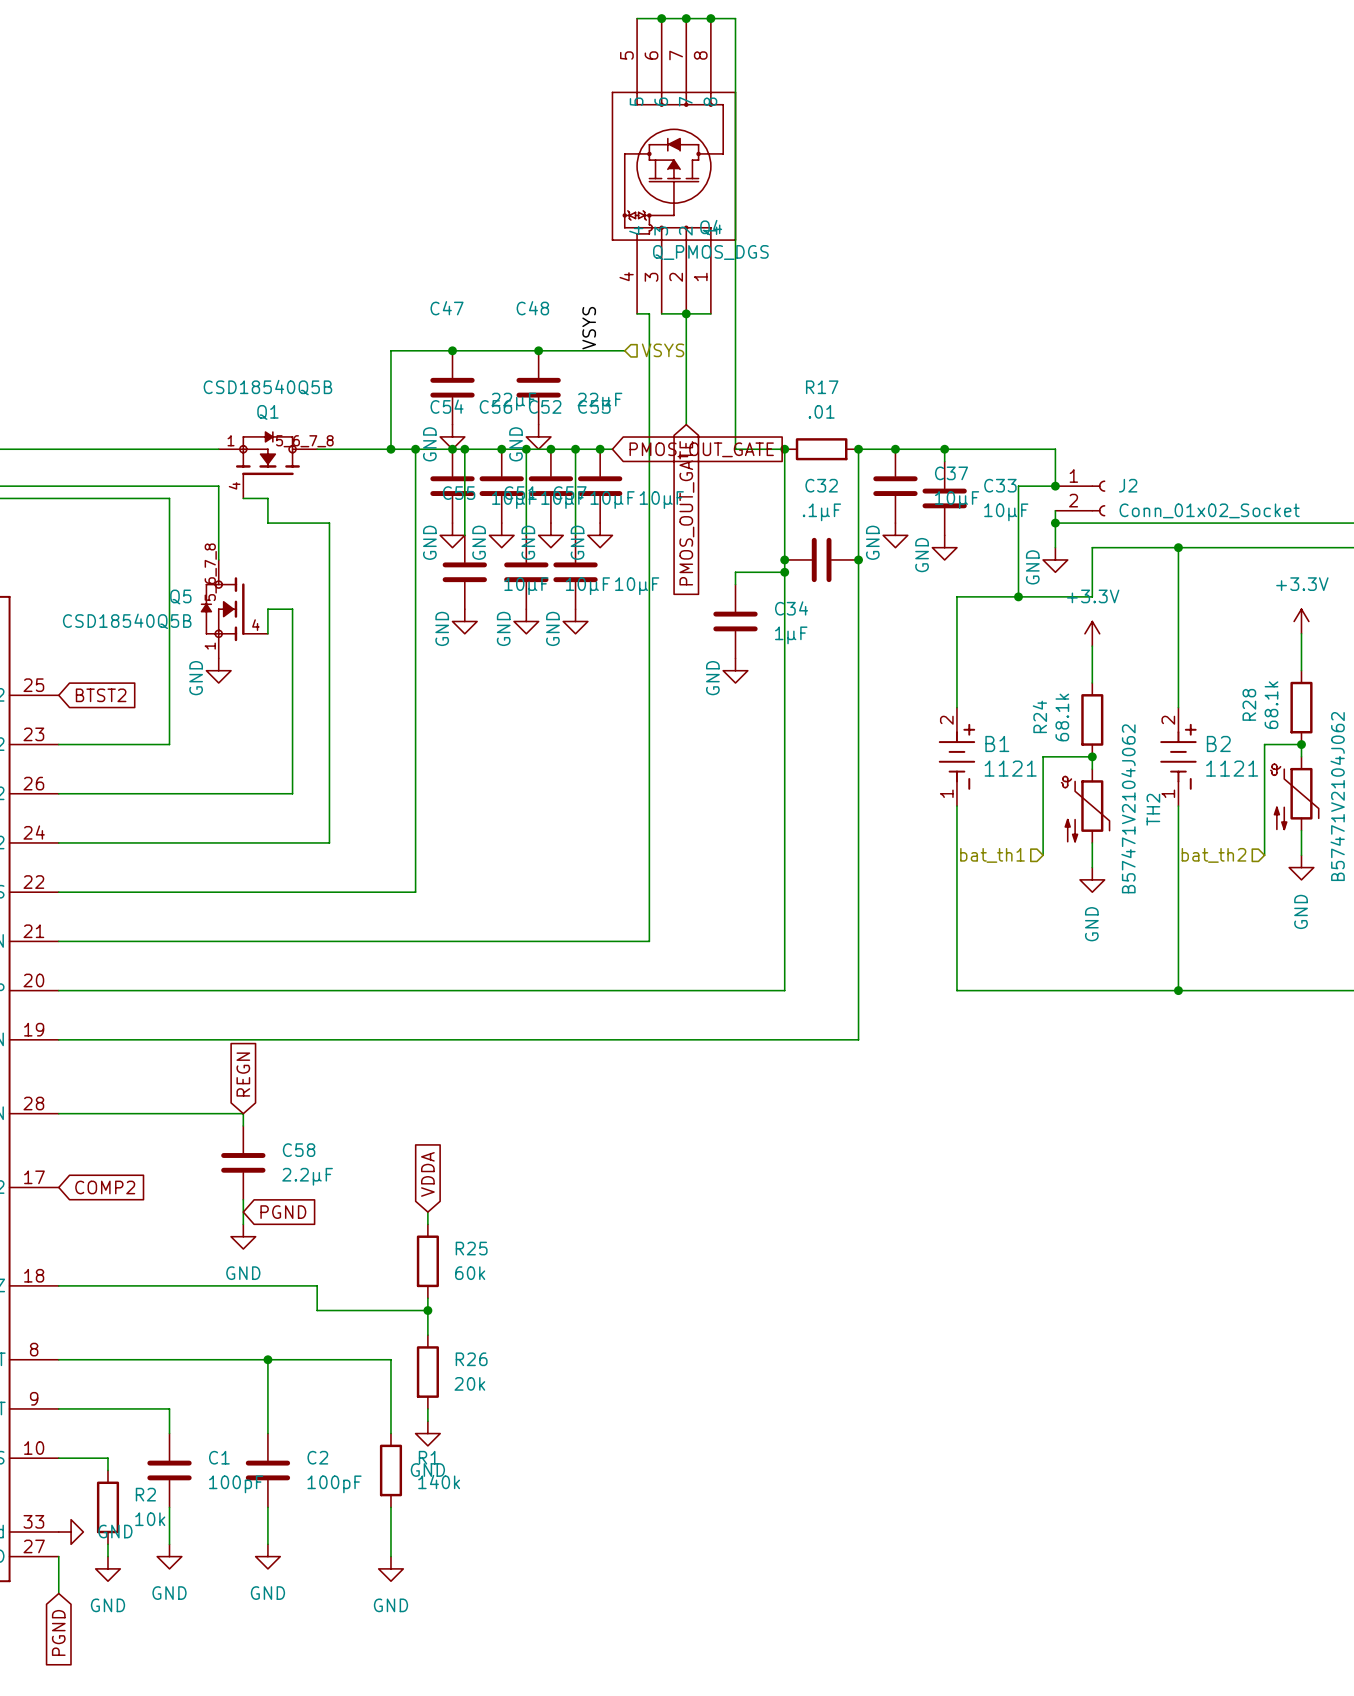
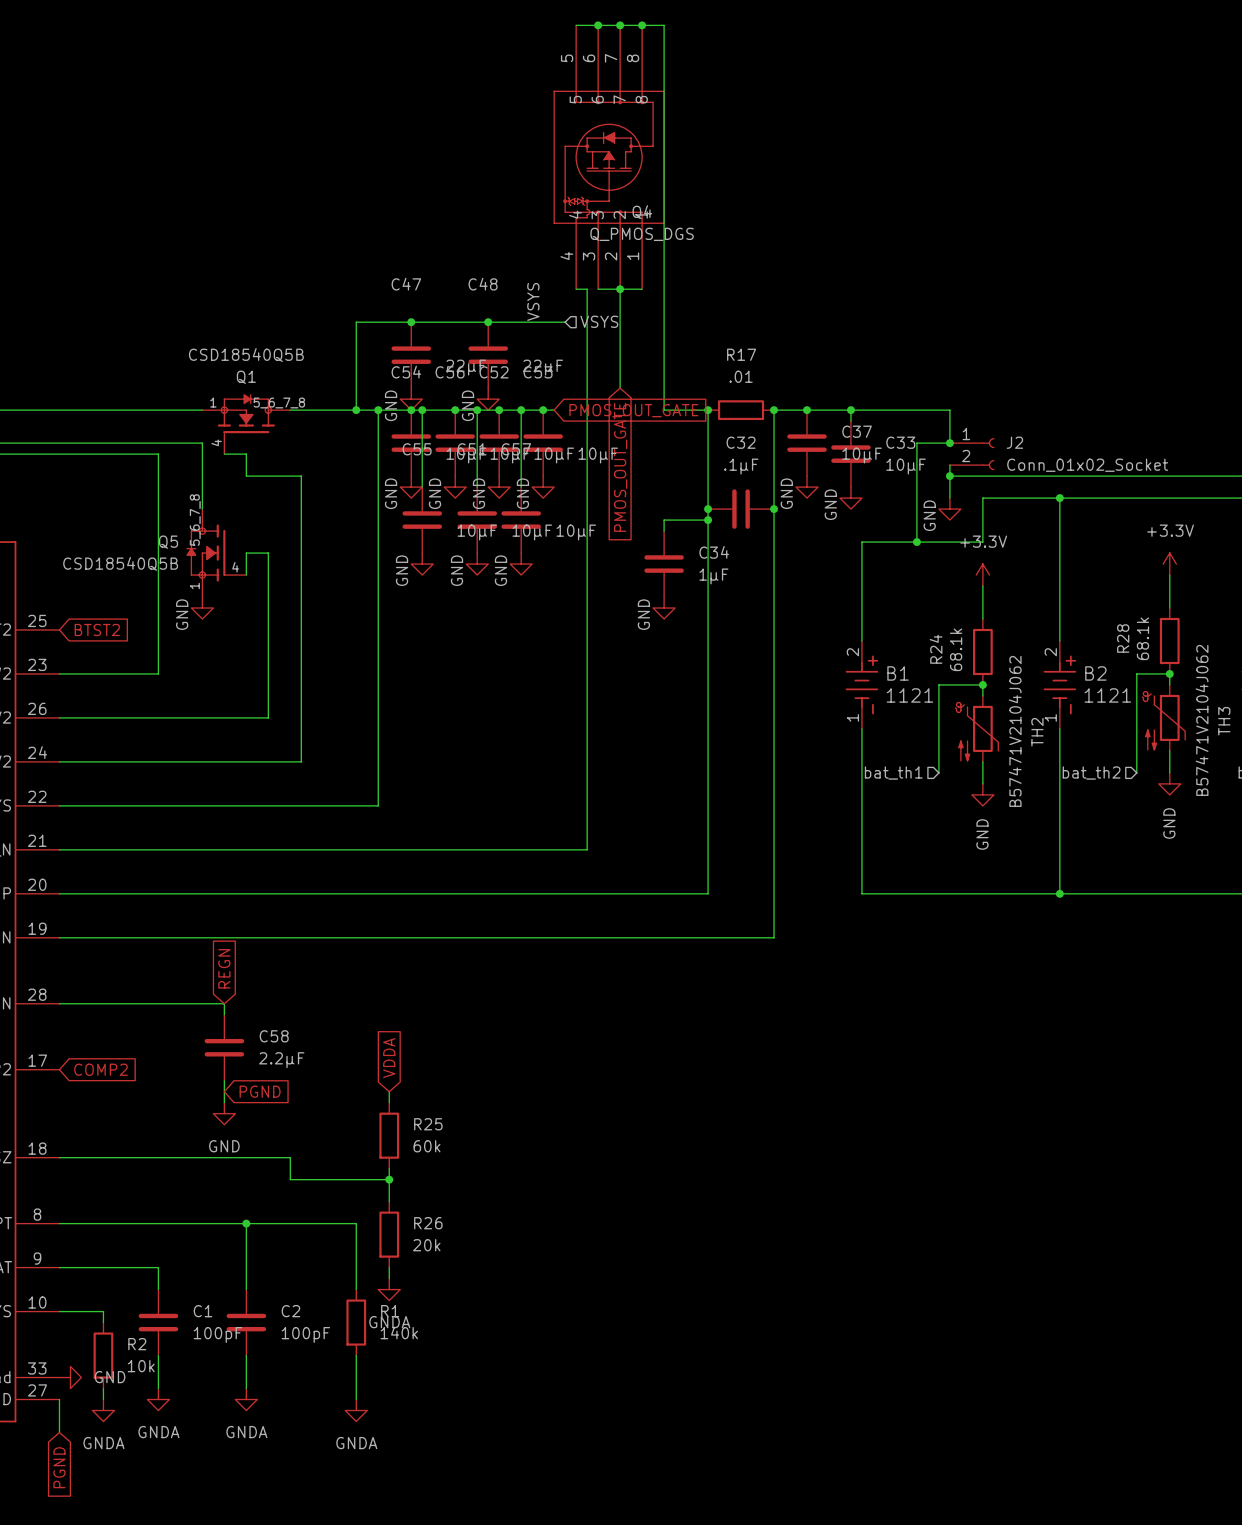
power symbol: GND (427, 1433) -> GNDA (389, 1289)
power symbol: GND (169, 1556) -> GNDA (158, 1399)
power symbol: GND (267, 1556) -> GNDA (246, 1399)
power symbol: GND (107, 1568) -> GNDA (103, 1410)
power symbol: GND (390, 1568) -> GNDA (356, 1410)

